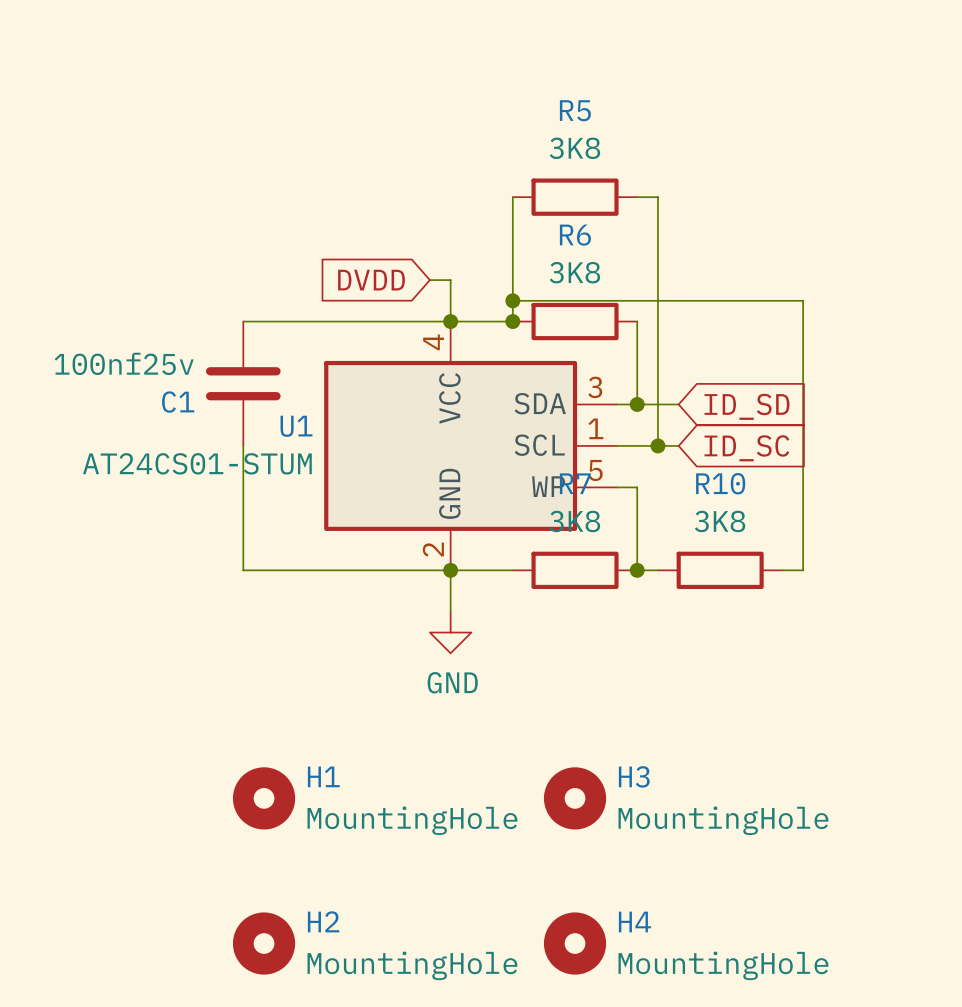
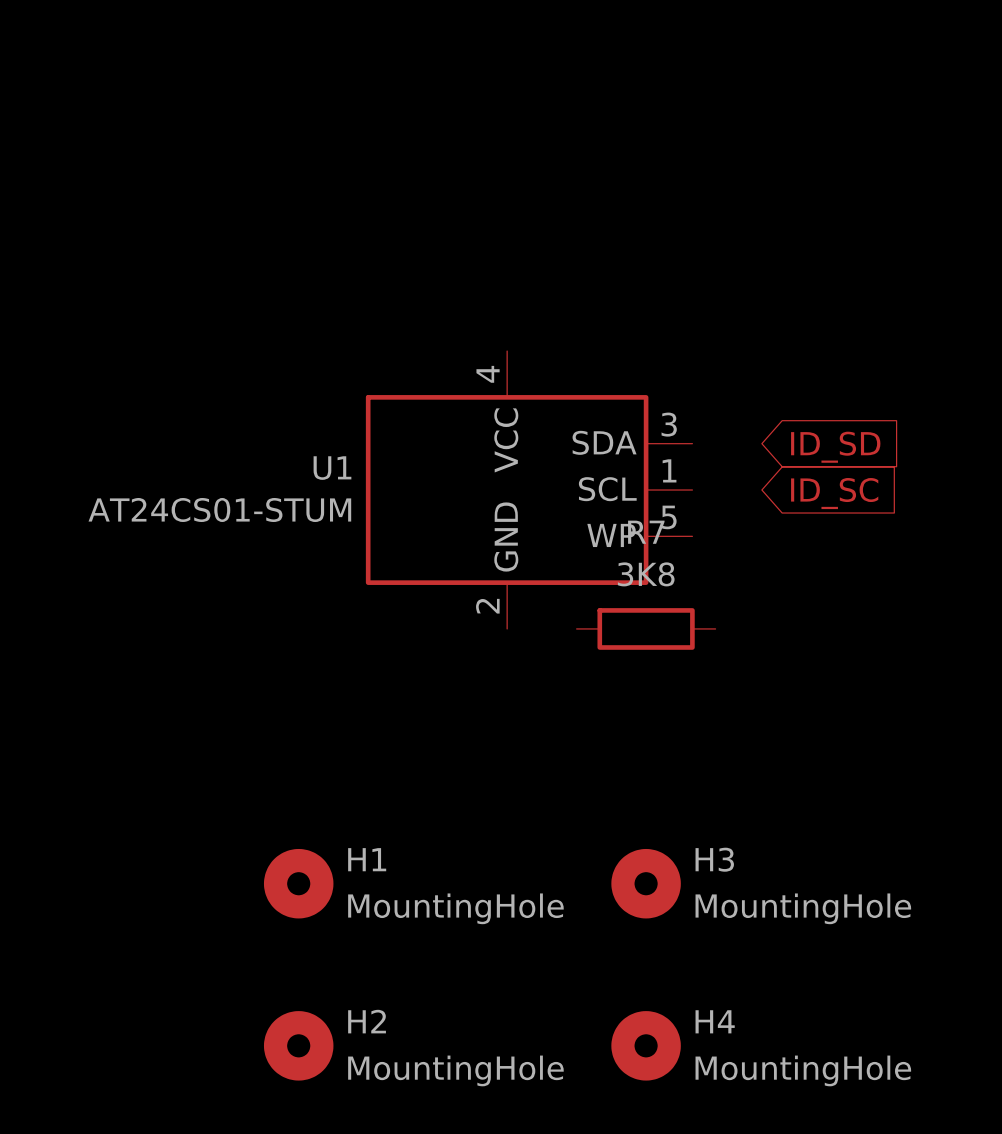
wire: (512, 197) (512, 321) (243, 321) -> none
R5: 3K8 (575, 197) -> none
wire: (637, 197) (657, 197) (657, 445) -> none
global label: DVDD (371, 280) -> none
wire: (429, 280) (450, 280) (450, 321) -> none
wire: (512, 300) (803, 300) (803, 570) (782, 570) -> none
junction: (512, 300) -> none
junction: (450, 321) -> none
junction: (512, 321) -> none
R6: 3K8 (575, 321) -> none
wire: (637, 321) (637, 404) -> none
C1: 100nf25v (243, 383) -> none
wire: (616, 404) (678, 404) -> none
junction: (637, 404) -> none
wire: (243, 445) (243, 570) (512, 570) -> none
wire: (616, 445) (678, 445) -> none
junction: (657, 445) -> none
wire: (616, 487) (637, 487) (637, 570) (657, 570) -> none
wire: (450, 570) (450, 611) -> none
junction: (450, 570) -> none
junction: (637, 570) -> none
R10: 3K8 (720, 570) -> none
power symbol: GND (450, 632) -> none

